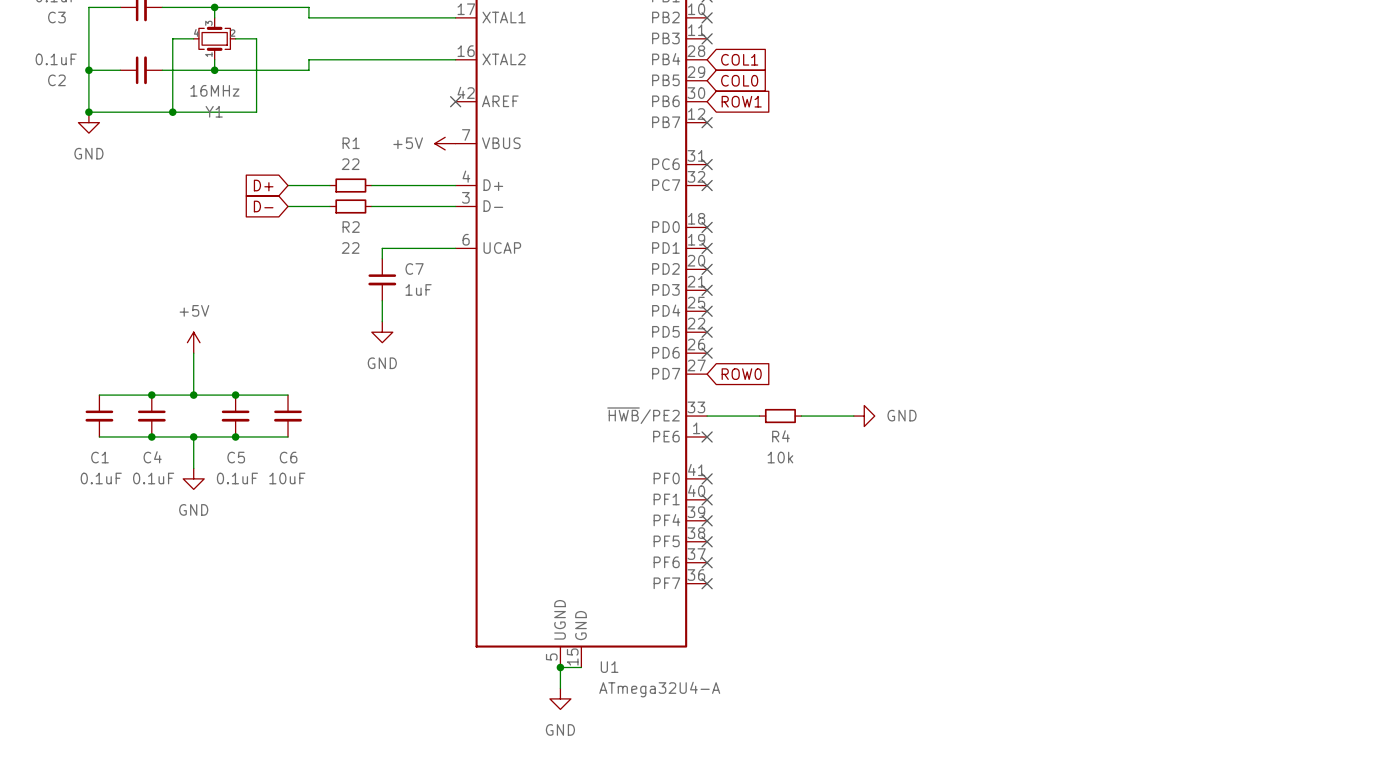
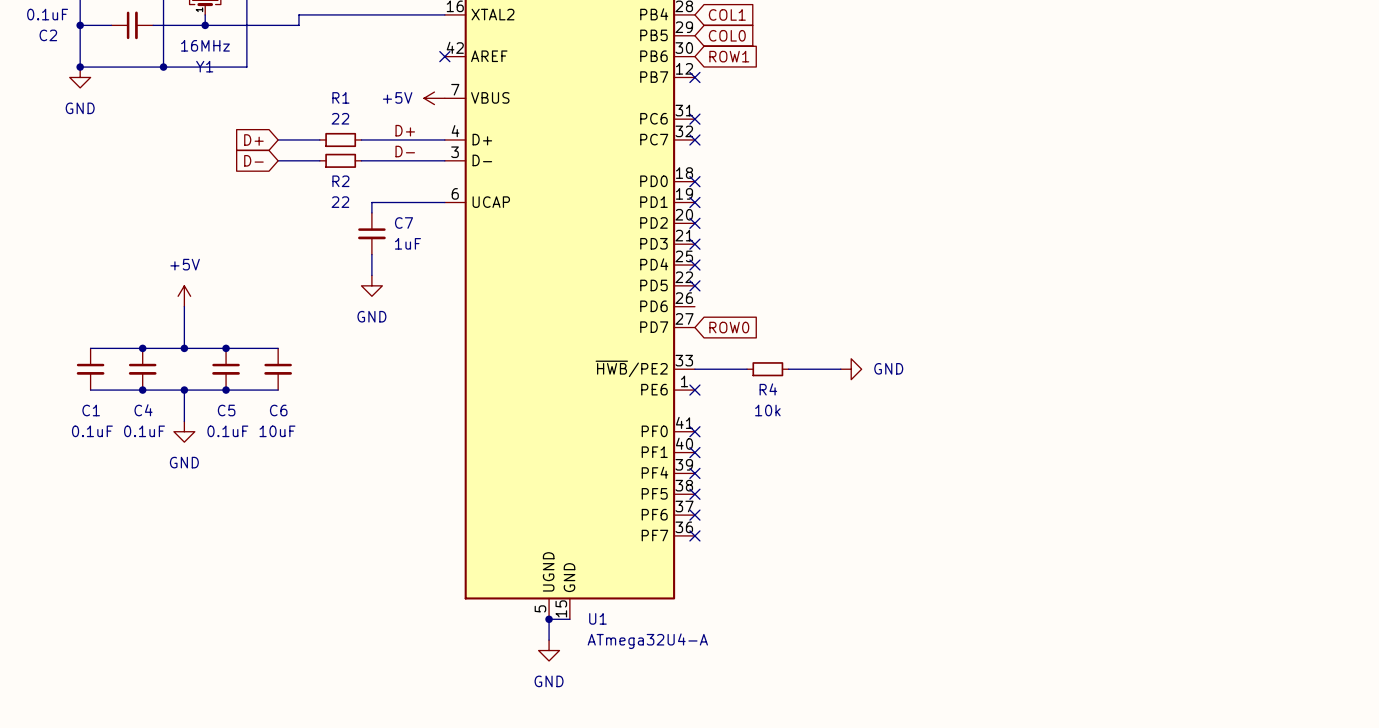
label: none -> D+ (405, 130)
label: none -> D- (405, 151)
no-connect mark: (707, 353) -> none

